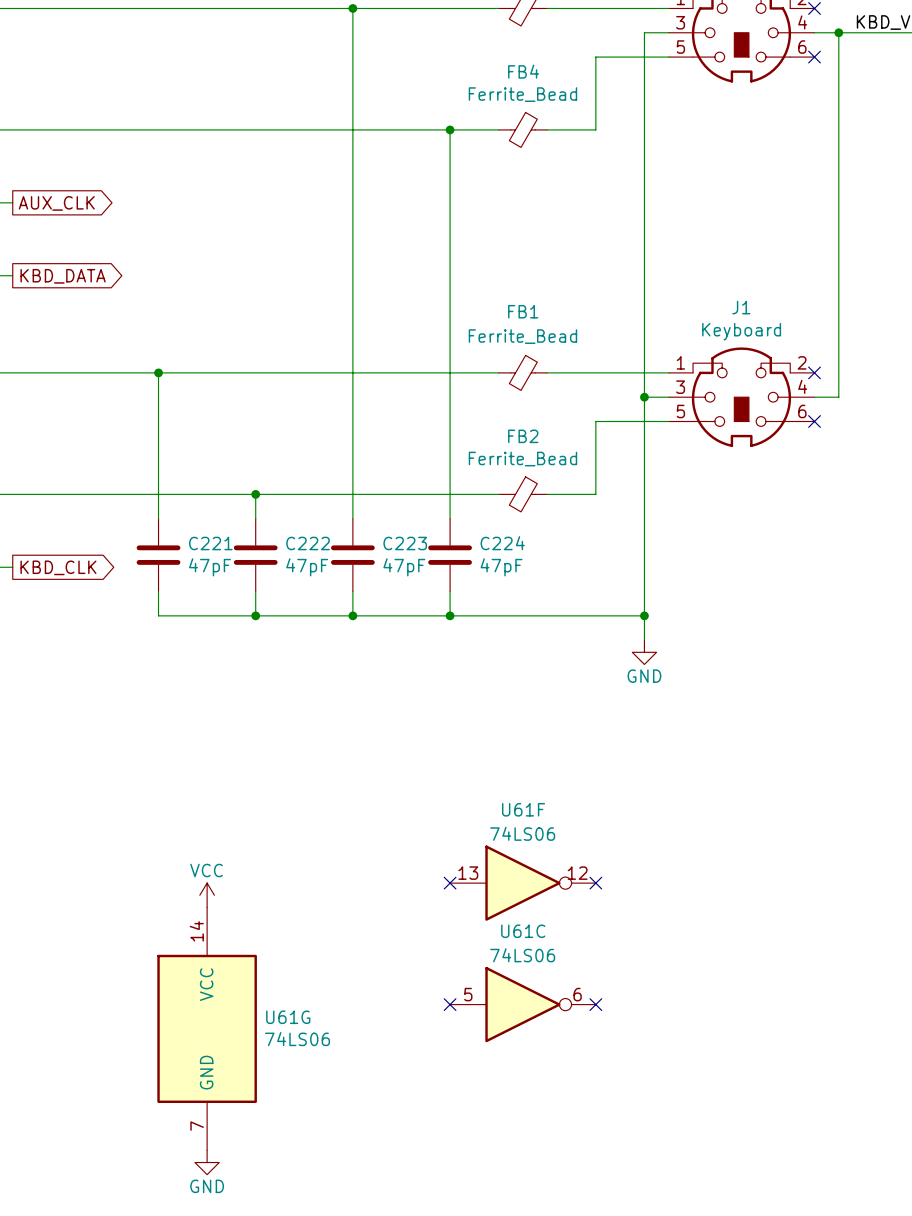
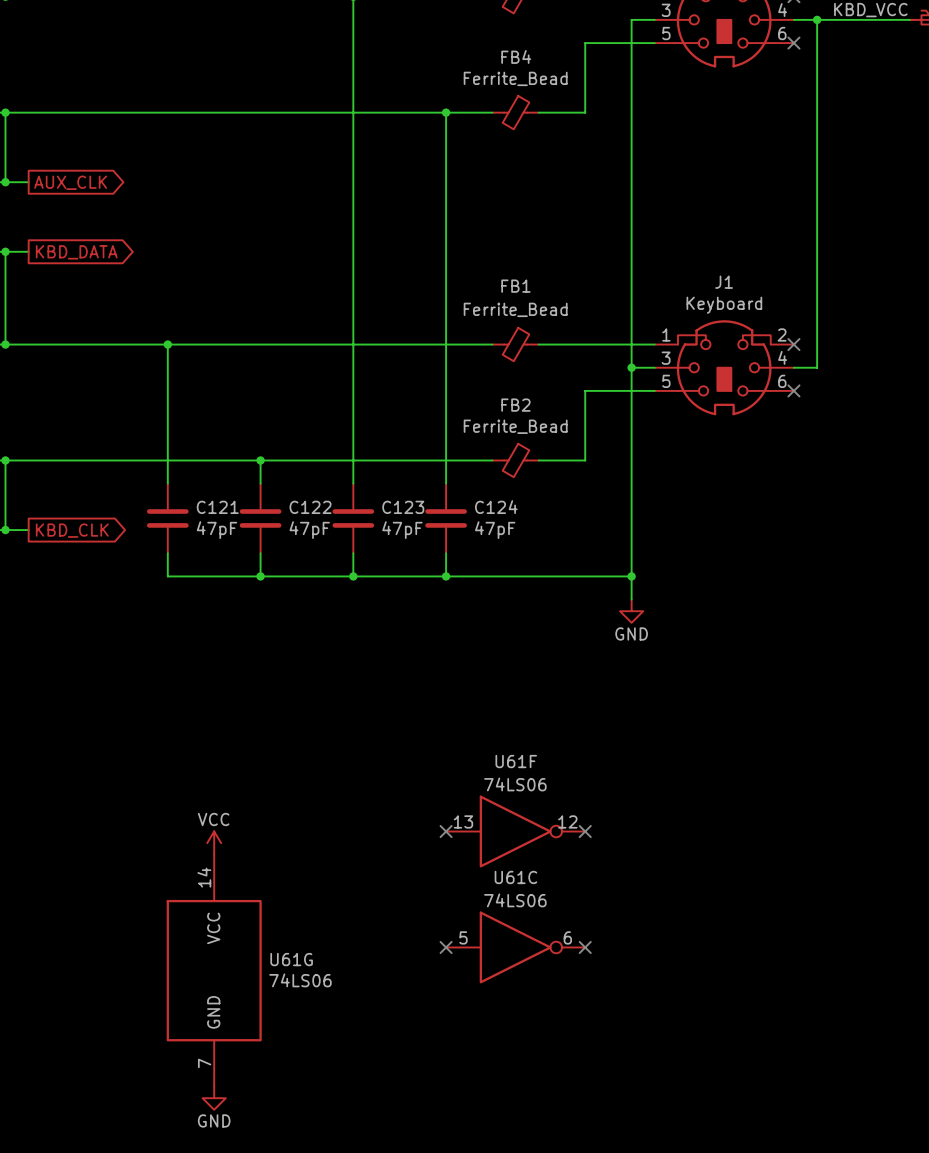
C221 name: C221 (210, 543) -> C121 (217, 507)
C222 name: C222 (308, 543) -> C122 (310, 507)
C223 name: C223 (405, 543) -> C123 (403, 507)
C224 name: C224 (502, 543) -> C124 (496, 507)

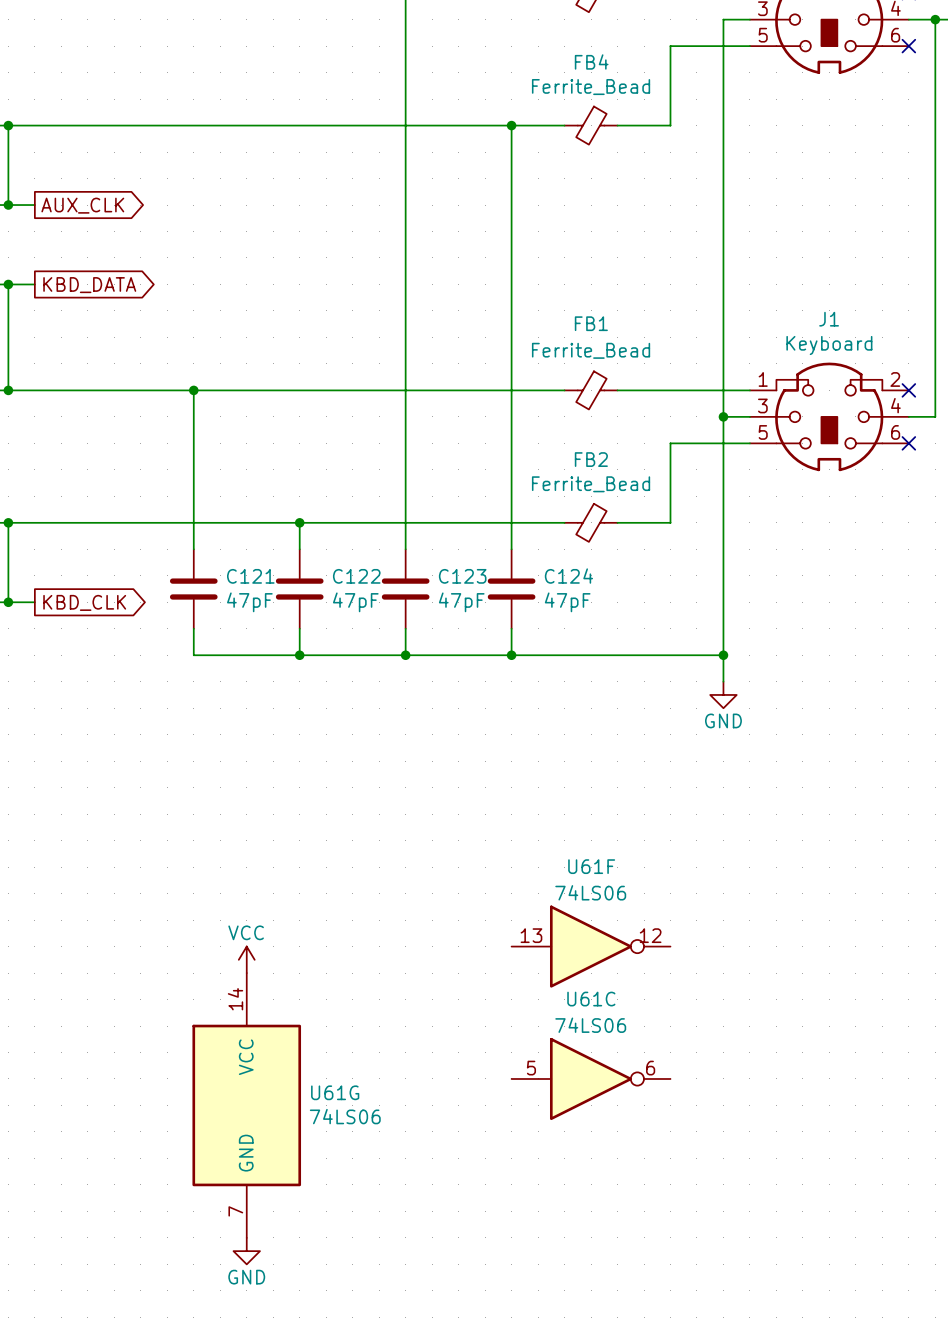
no-connect mark: (446, 831) -> none
no-connect mark: (585, 831) -> none
no-connect mark: (446, 947) -> none
no-connect mark: (585, 947) -> none

